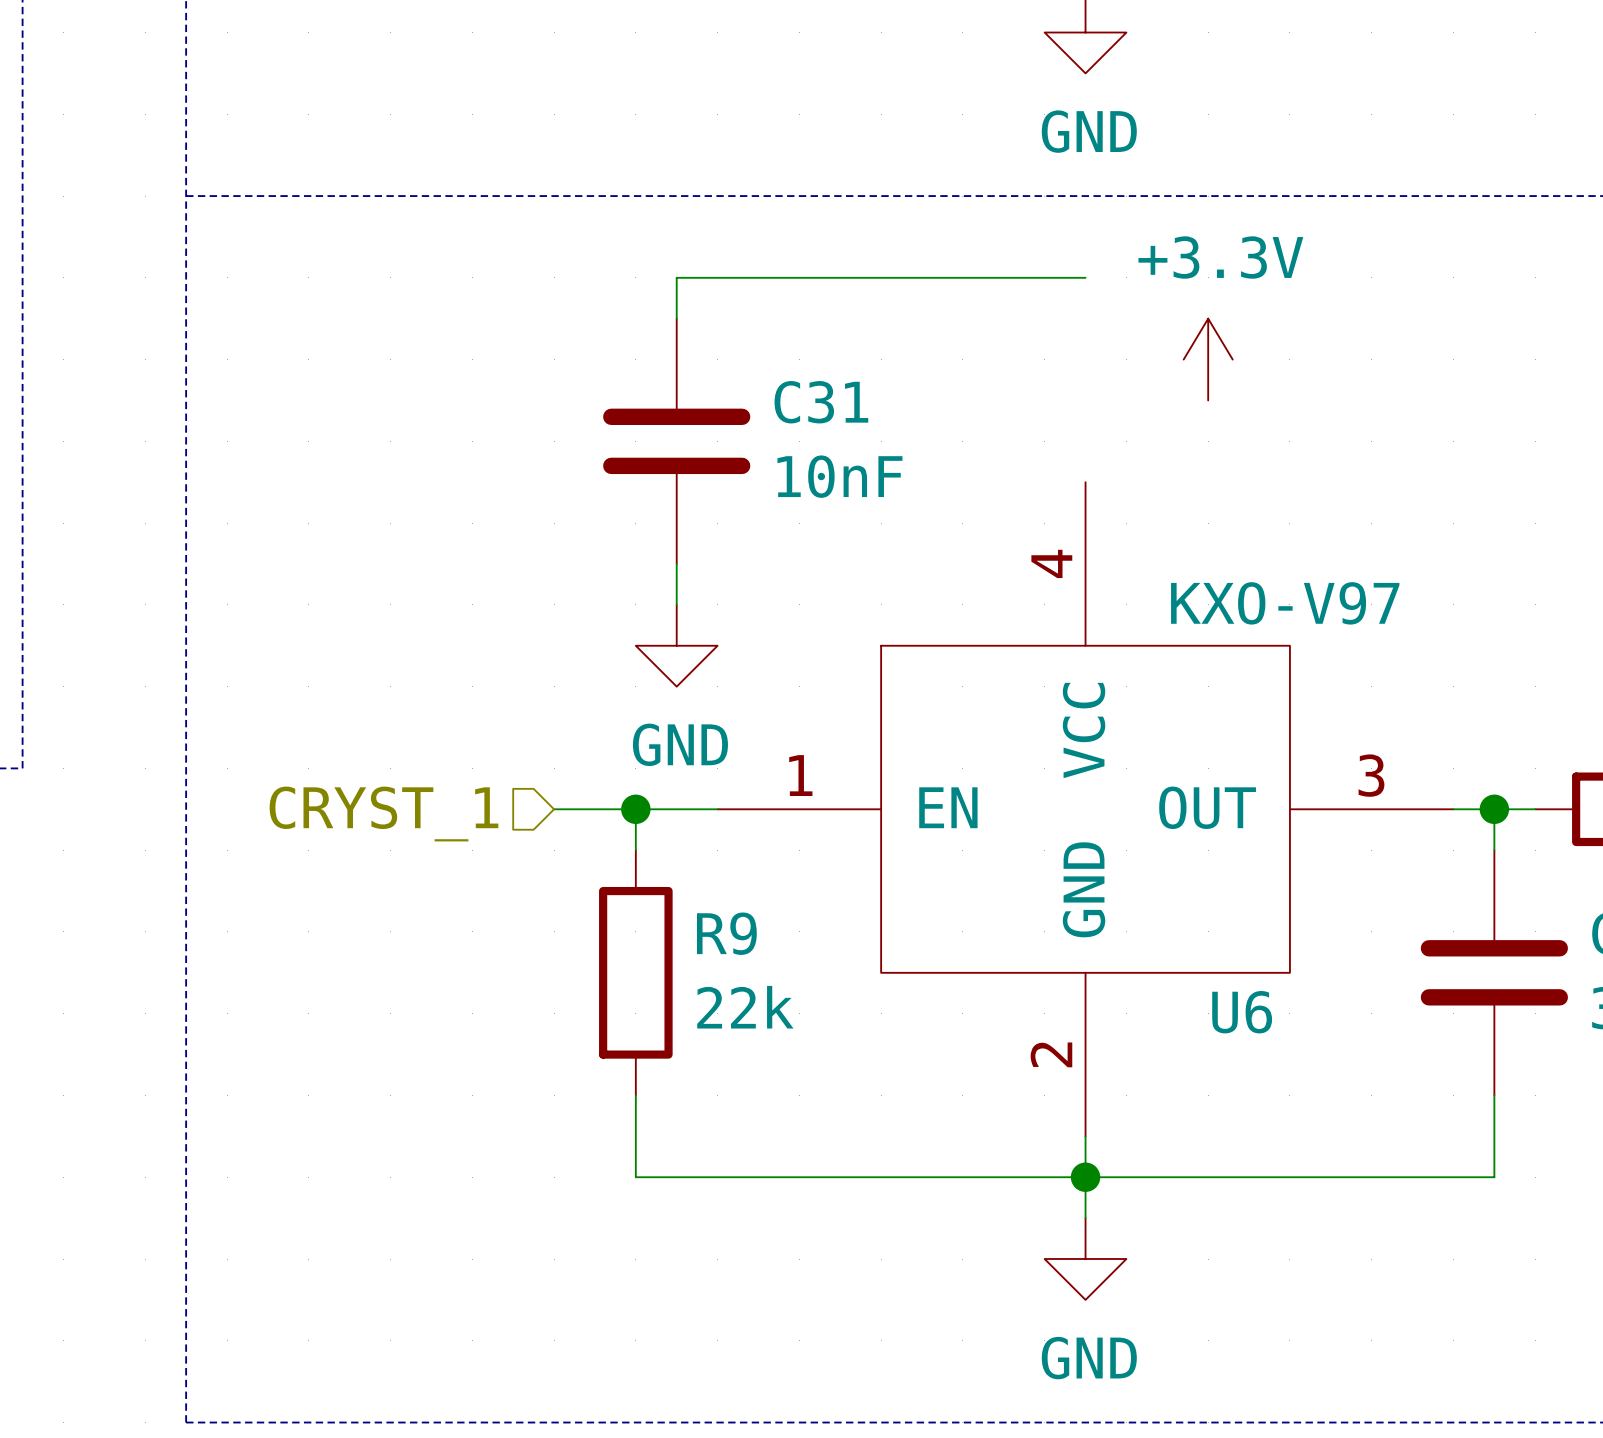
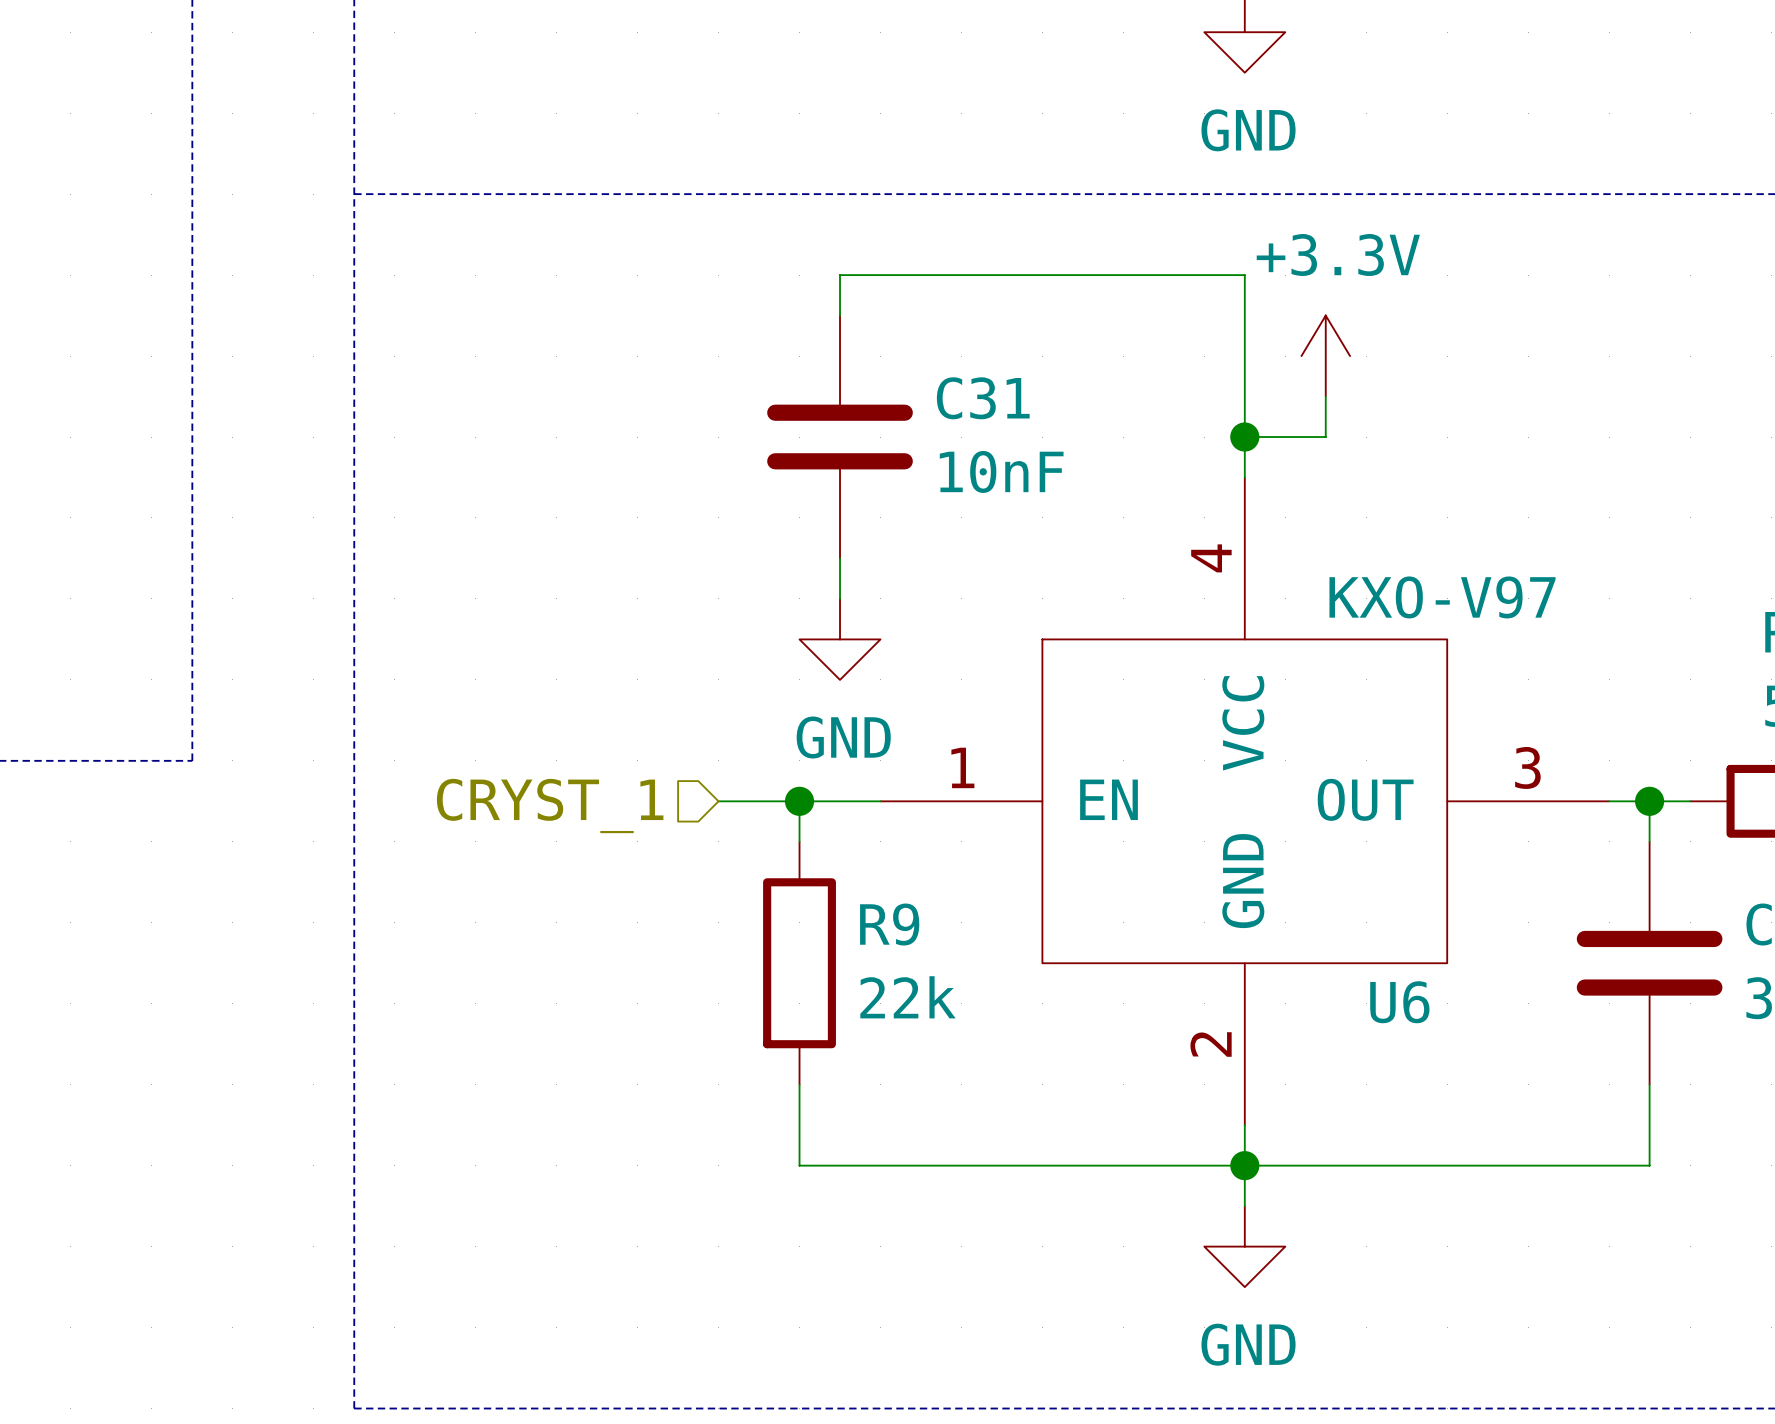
wire: none -> (1244, 275) (1244, 477)
power symbol position: +3.3V (1208, 359) -> +3.3V (1325, 356)
wire: none -> (1325, 396) (1325, 437) (1244, 437)
junction: none -> (1244, 437)

